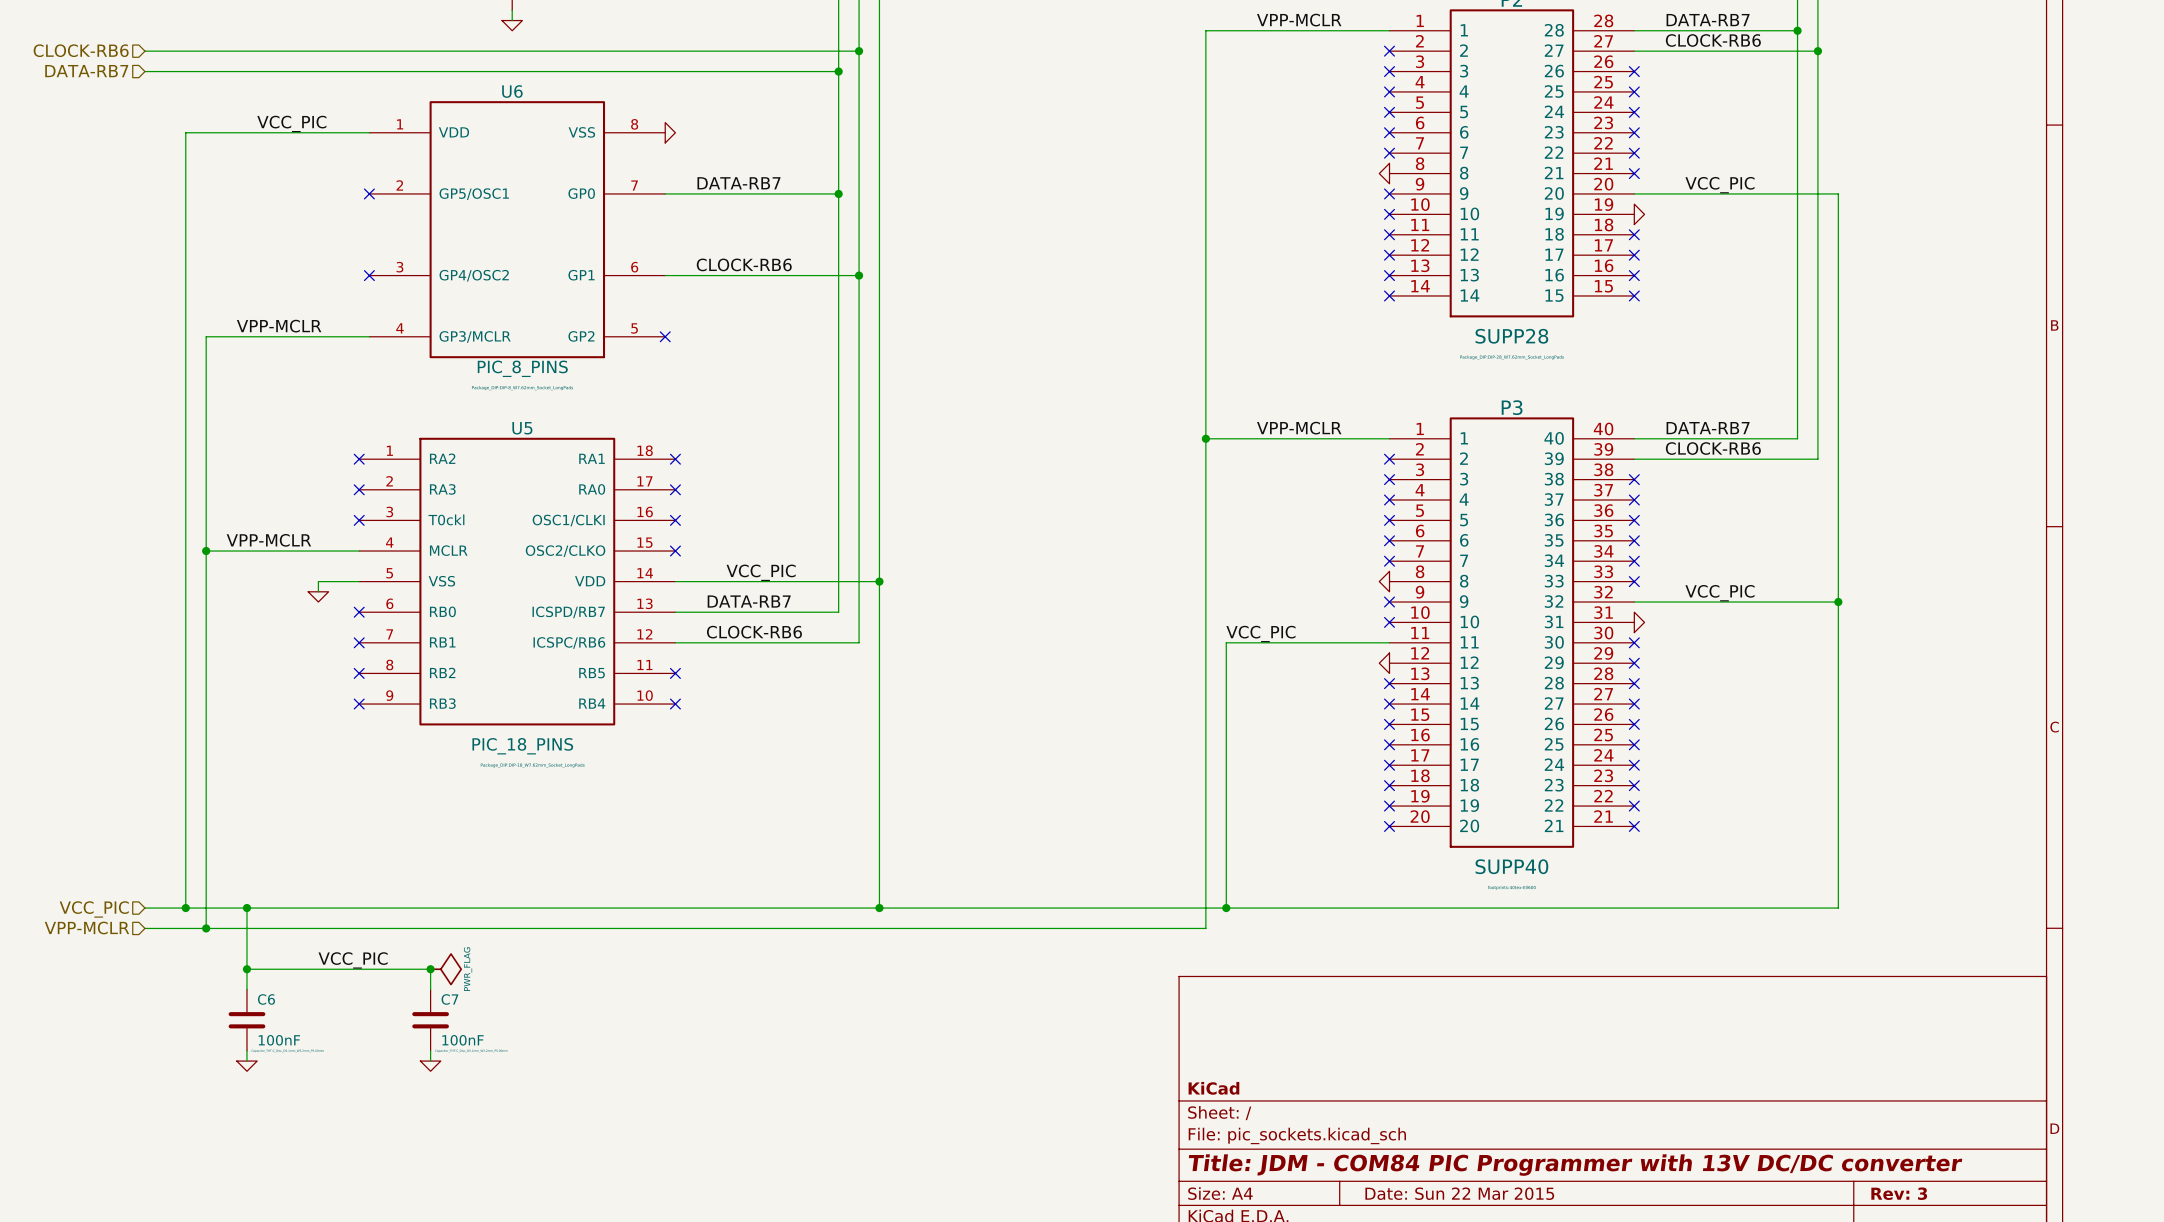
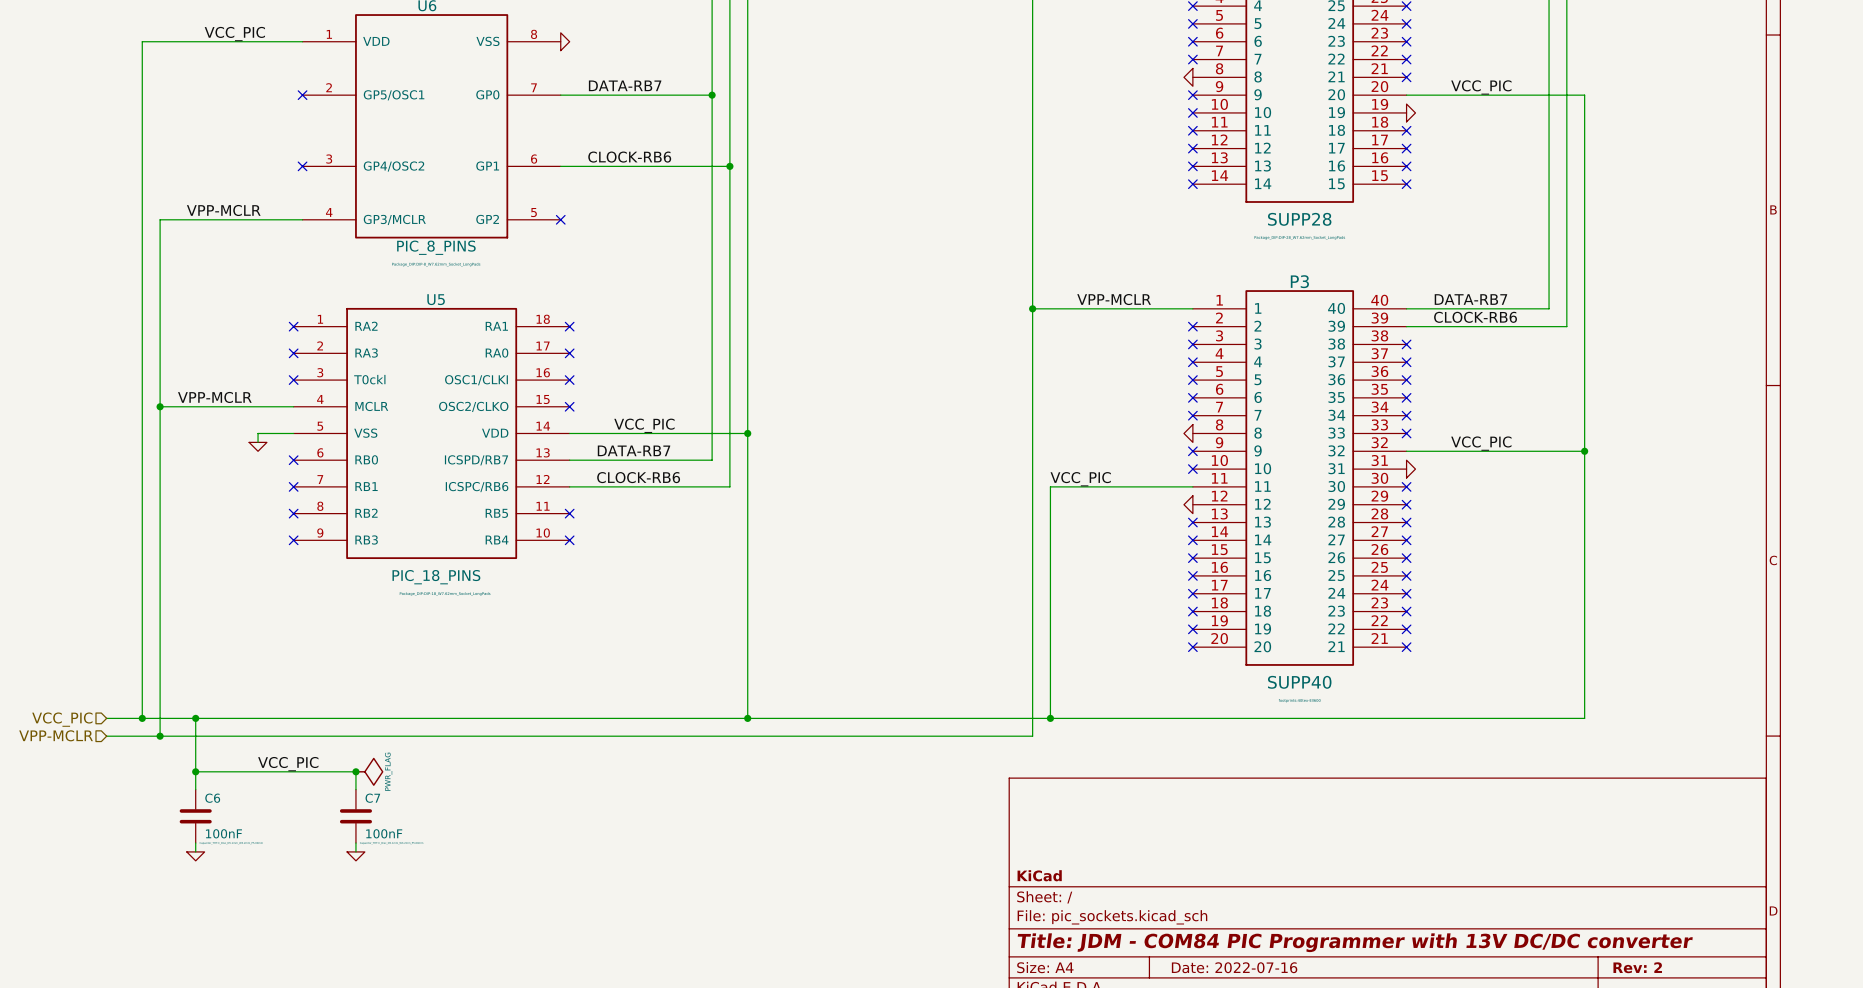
title block: Date: Sun 22 Mar 2015 (1459, 1193) -> Date: 2022-07-16 (1234, 967)
title block: Rev: 3 (1899, 1193) -> Rev: 2 (1637, 967)

